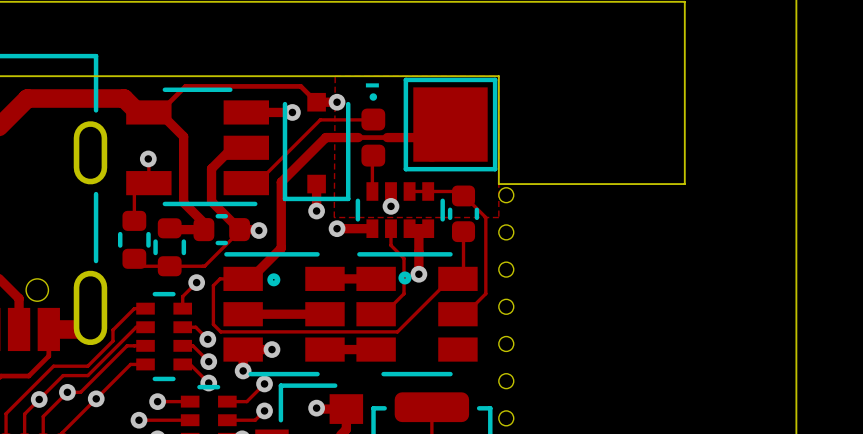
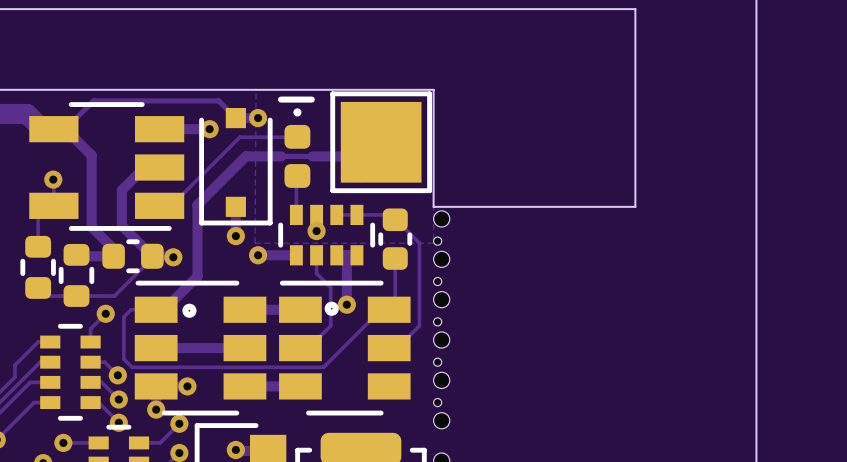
part: none -> (437, 241)
part: none -> (437, 281)
part: none -> (437, 321)
part: none -> (437, 362)
part: none -> (437, 402)

